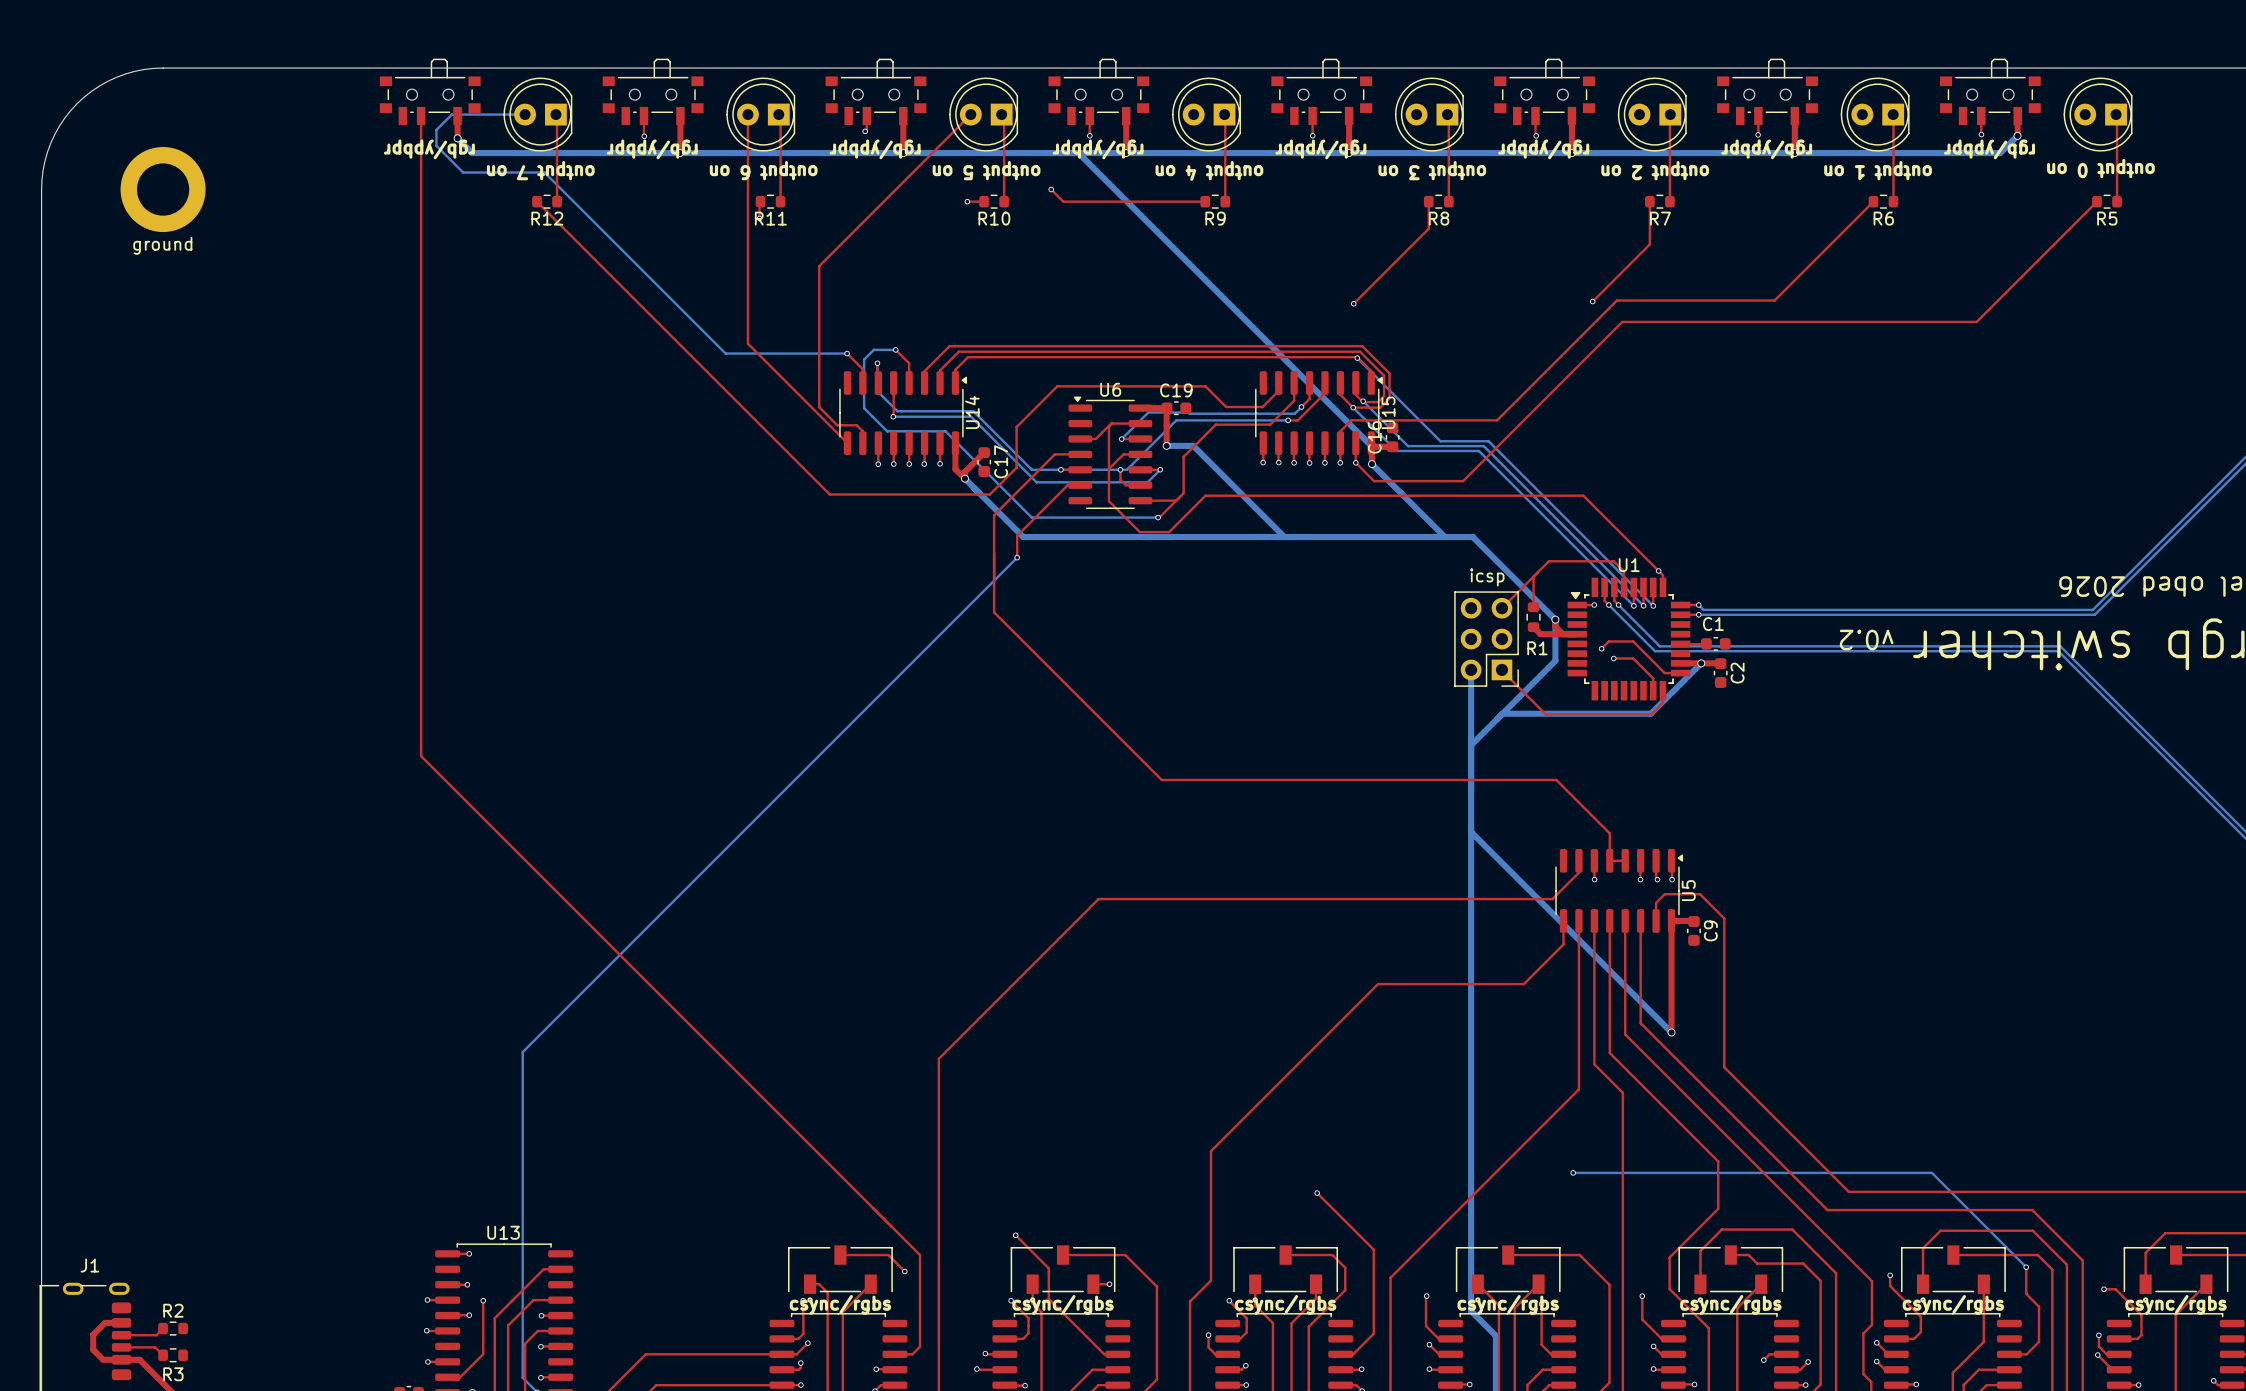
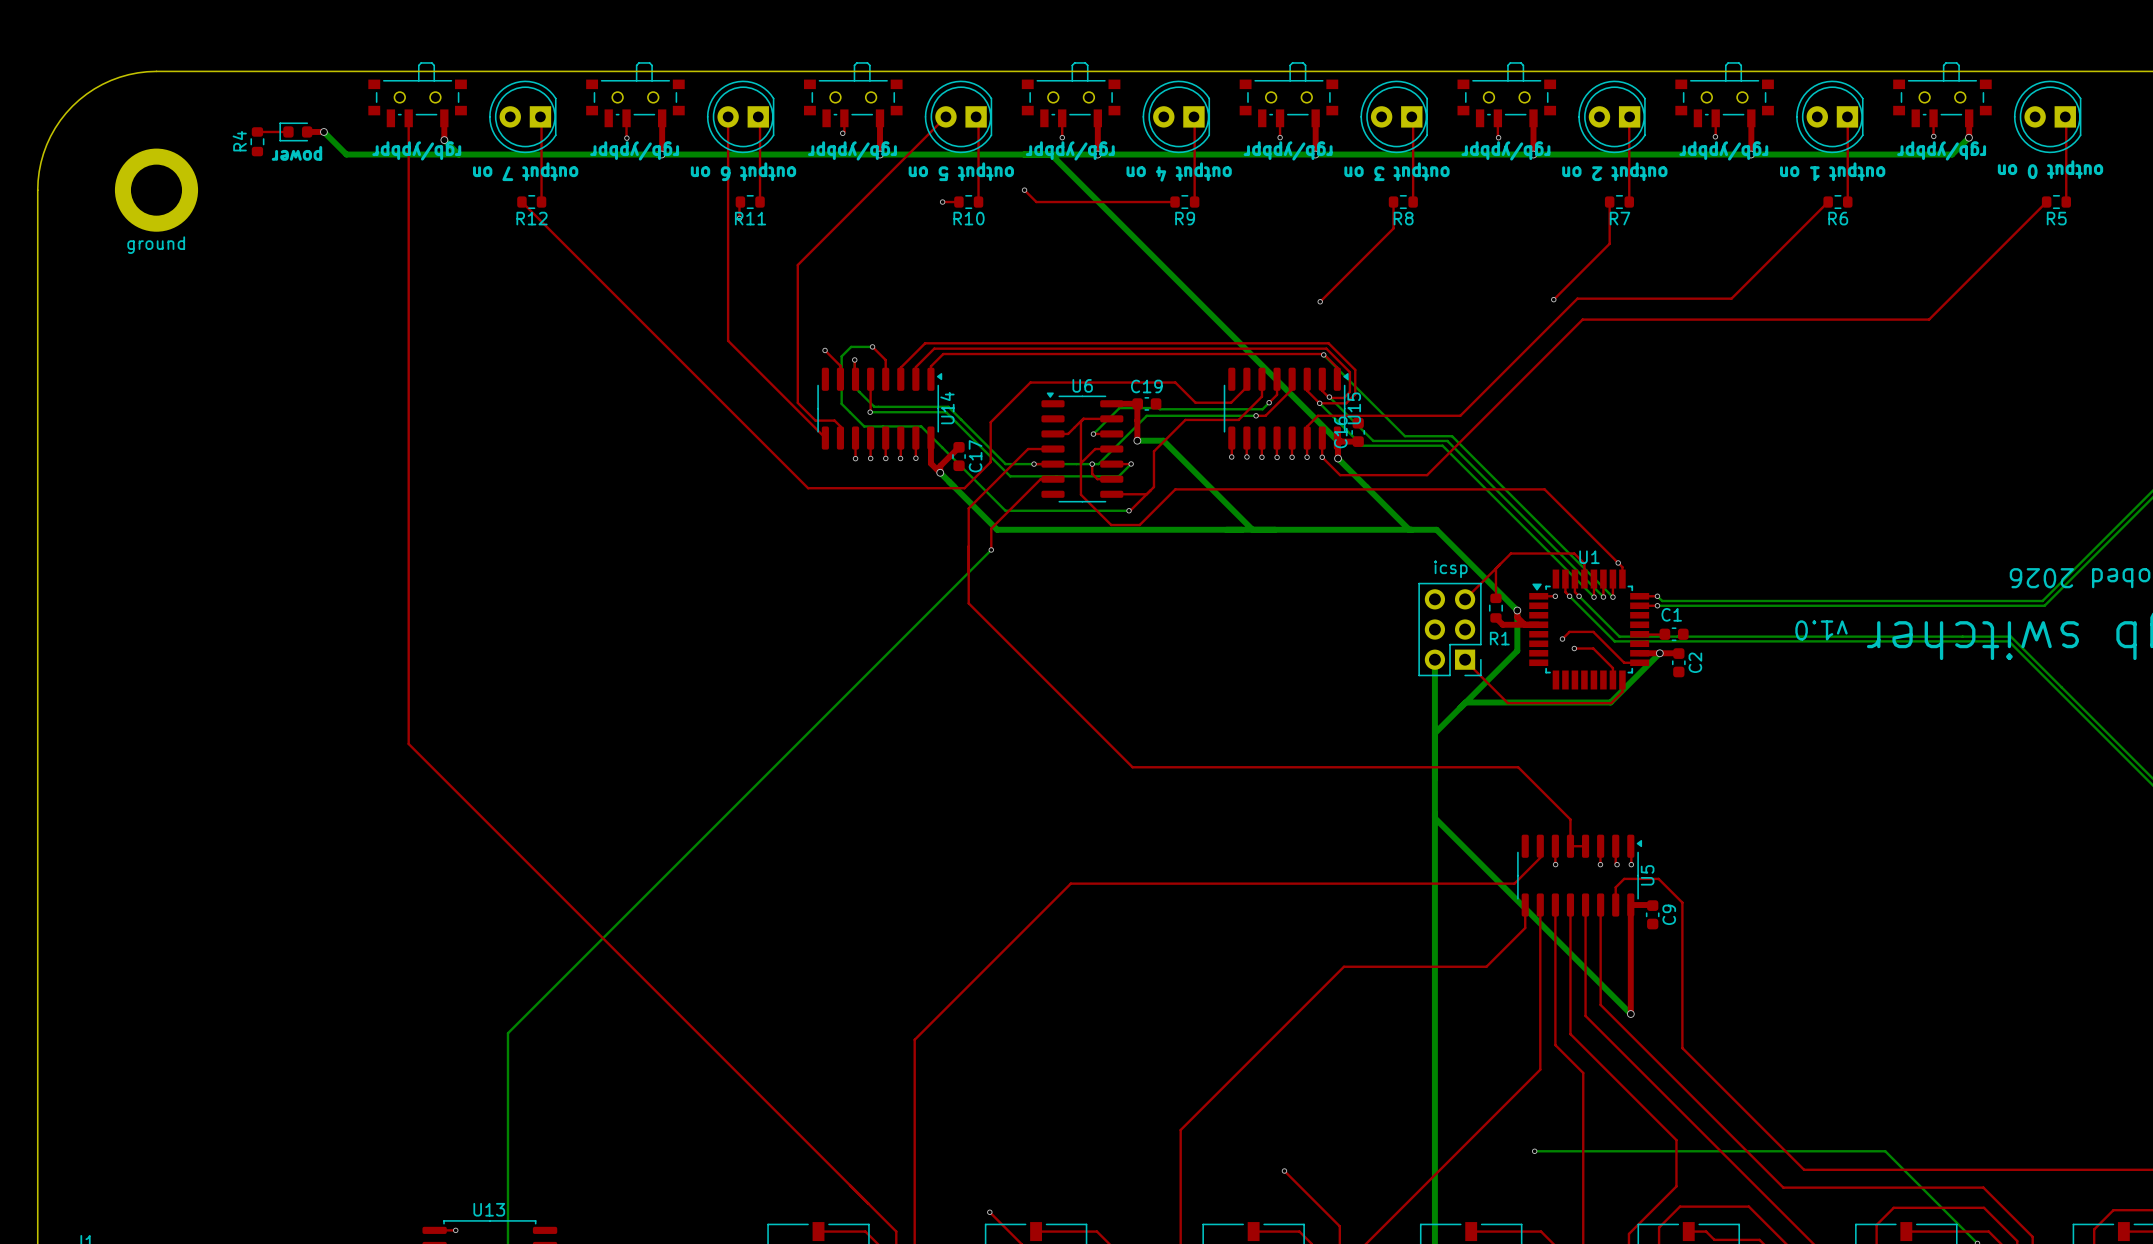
bottom track: (525, 114) (451, 114) (436, 129) (436, 145) (463, 172) (544, 172) (725, 353) (847, 353) -> none
top track: none -> (257, 131) (288, 131)
part: none -> power (295, 131)
top track: none -> (307, 131) (323, 131)
bottom track: none -> (323, 131) (346, 154) (458, 154)
via: none -> (323, 131)
R4: none -> (257, 141)
text: v0.2 (1866, 640) -> v1.0 (1821, 630)

